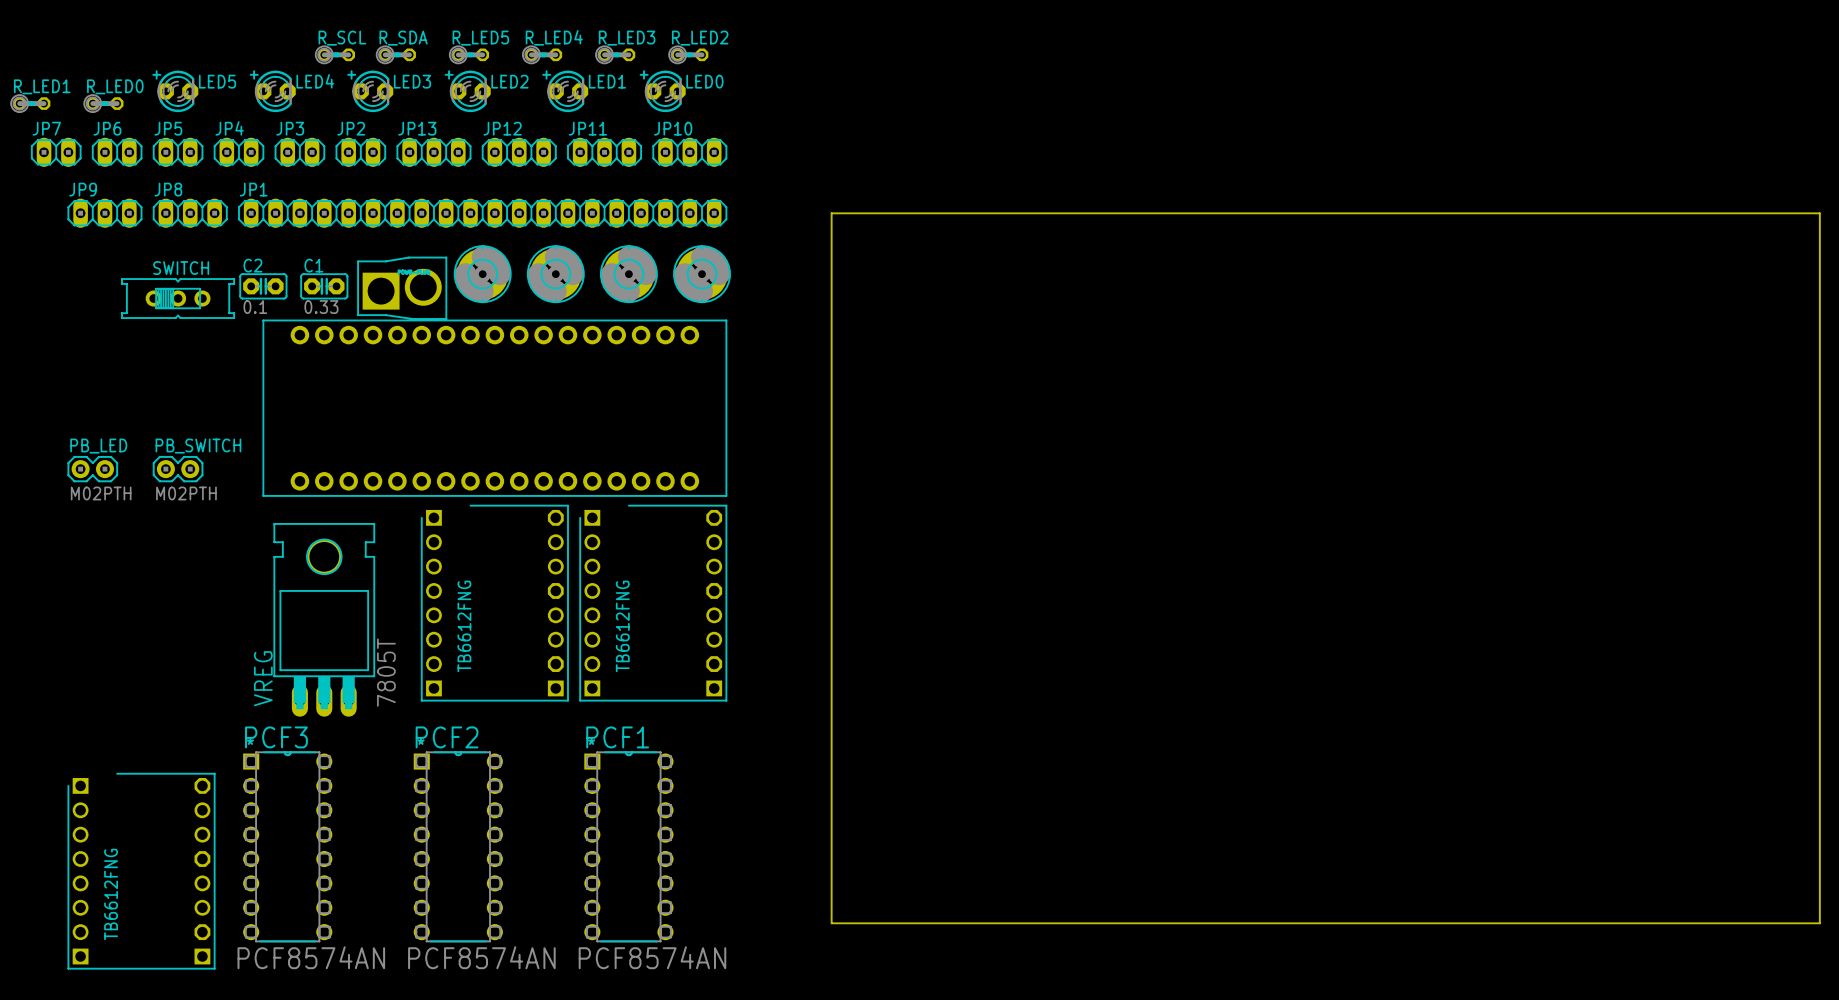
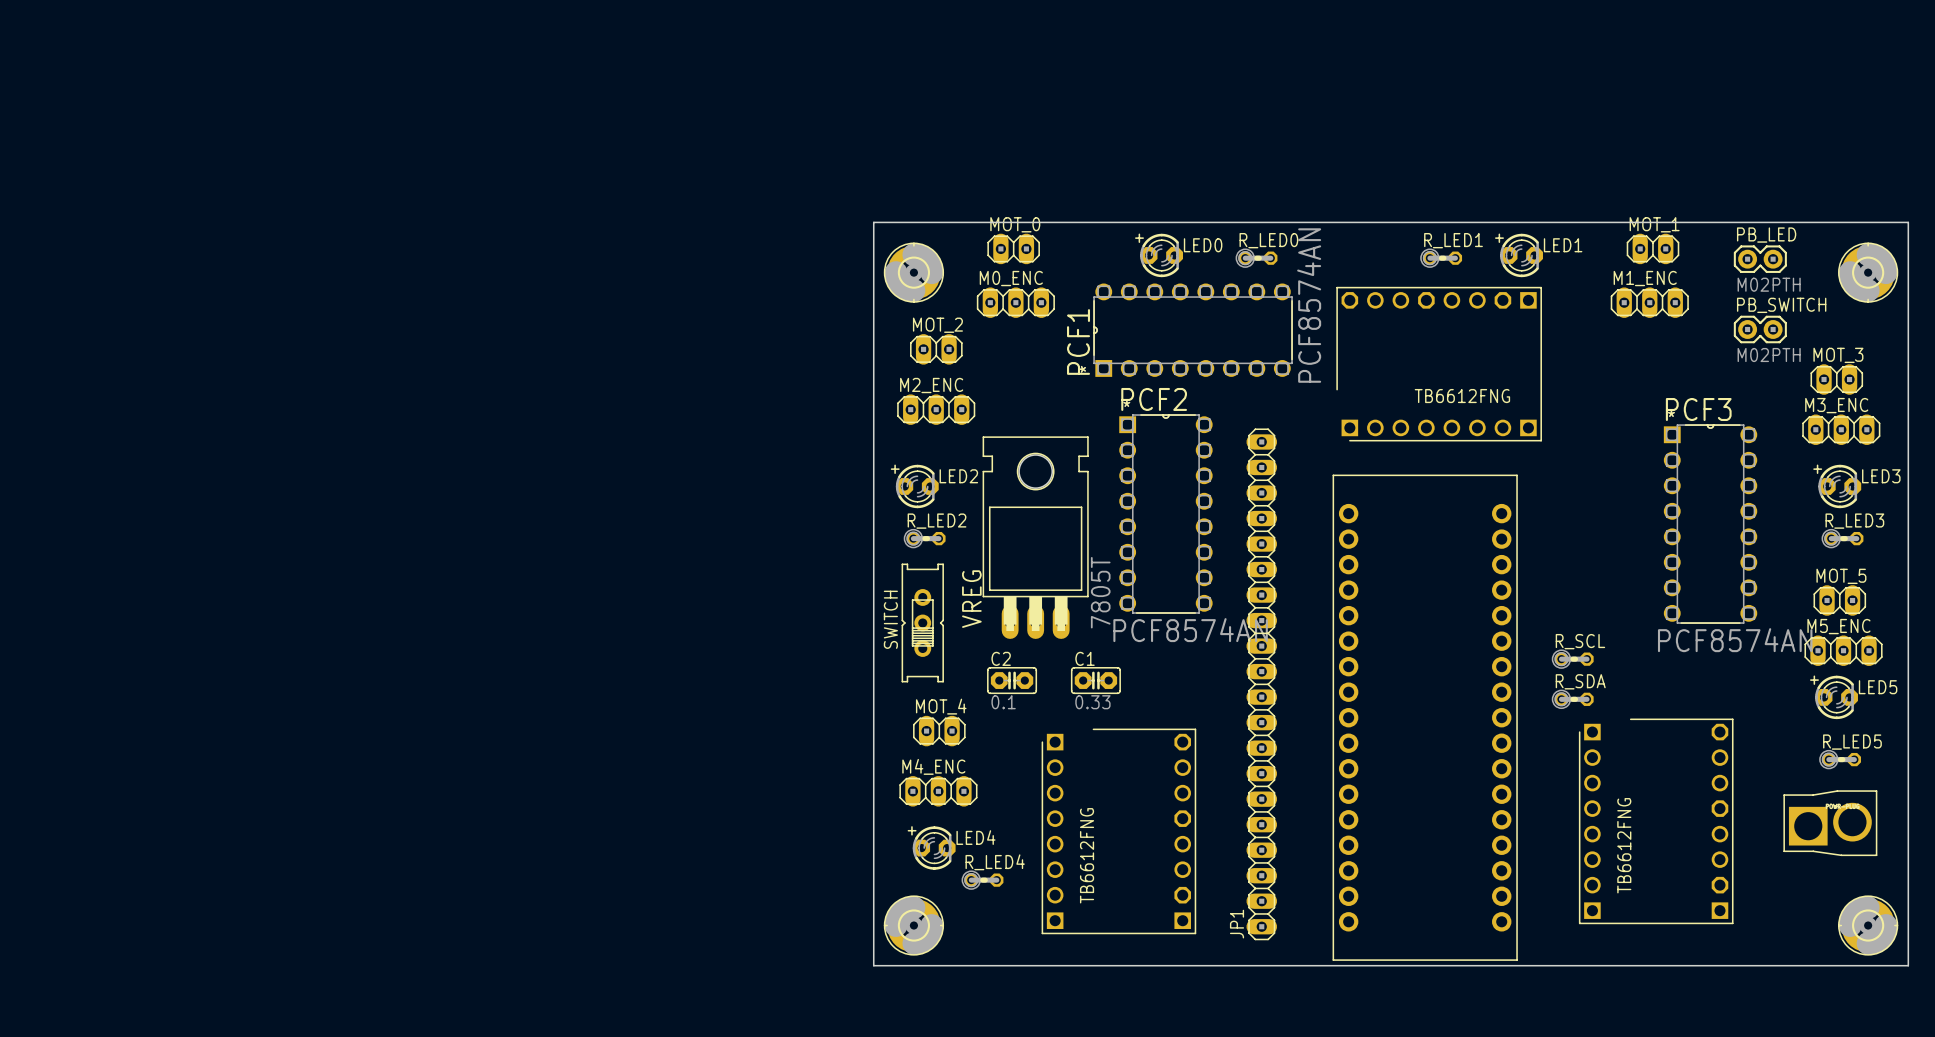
R_SCL: (335, 54) -> none
R_SDA: (395, 54) -> none
R_LED5 position: (469, 54) -> (1840, 759)
R_LED4 position: (542, 54) -> (982, 880)
R_LED3 position: (615, 54) -> (1842, 538)
R_LED2 position: (688, 54) -> (924, 538)
LED5 position: (175, 91) -> (1834, 697)
LED4 position: (272, 91) -> (931, 848)
LED3 position: (370, 91) -> (1837, 486)
LED2 position: (467, 91) -> (914, 486)
LED1 position: (565, 91) -> (1519, 255)
LED0 position: (662, 91) -> (1159, 255)
R_LED1 position: (30, 103) -> (1441, 258)
R_LED0 position: (103, 103) -> (1256, 258)
JP7: (56, 152) -> none
JP6: (117, 152) -> none
JP5: (178, 152) -> none
JP4: (239, 152) -> none
JP3: (299, 152) -> none
JP2: (360, 152) -> none
JP13: (433, 152) -> none
JP12: (519, 152) -> none
JP11: (604, 152) -> none
JP10: (689, 152) -> none
JP1 name position: JP1 (253, 189) -> JP1 (1237, 924)
JP9: (104, 213) -> none
JP8: (190, 213) -> none
JP1 rotation: 0° (482, 213) -> 90° clockwise (1261, 684)
JP1 position: (482, 213) -> (1261, 684)
MOT_0: none -> (1013, 248)
MOT_1: none -> (1652, 248)
PB_LED: none -> M02PTH (1760, 259)
part: none -> (913, 272)
part: none -> (1868, 272)
part: (482, 274) -> none
part: (555, 274) -> none
part: (628, 274) -> none
part: (702, 274) -> none
C2 position: (263, 286) -> (1012, 680)
C1 position: (324, 286) -> (1095, 680)
part: (402, 288) -> none
M0_ENC: none -> (1015, 302)
M1_ENC: none -> (1649, 302)
SWITCH: (178, 298) -> none
PB_SWITCH: none -> M02PTH (1760, 329)
MOT_2: none -> (936, 349)
part: none -> (1439, 364)
MOT_3: none -> (1836, 379)
M2_ENC: none -> (936, 409)
part: (494, 408) -> none
M3_ENC: none -> (1841, 429)
PB_LED: M02PTH (92, 469) -> none
PB_SWITCH: M02PTH (178, 469) -> none
VREG: none -> 7805T (1035, 537)
MOT_5: none -> (1839, 600)
SWITCH: none -> (922, 622)
part: (494, 603) -> none
part: (653, 603) -> none
VREG: 7805T (324, 619) -> none
M5_ENC: none -> (1843, 650)
R_SCL: none -> (1572, 659)
R_SDA: none -> (1572, 699)
part: none -> (1425, 717)
MOT_4: none -> (939, 731)
M4_ENC: none -> (938, 791)
part: none -> (1656, 821)
part: none -> (1830, 823)
part: none -> (1118, 831)
PCF3 position: (287, 846) -> (1710, 524)
PCF2 position: (458, 846) -> (1165, 514)
PCF1 rotation: 0° (628, 846) -> 90° counterclockwise (1193, 330)
PCF1 position: (628, 846) -> (1193, 330)
part: (141, 871) -> none
part: none -> (913, 925)
part: none -> (1868, 925)

